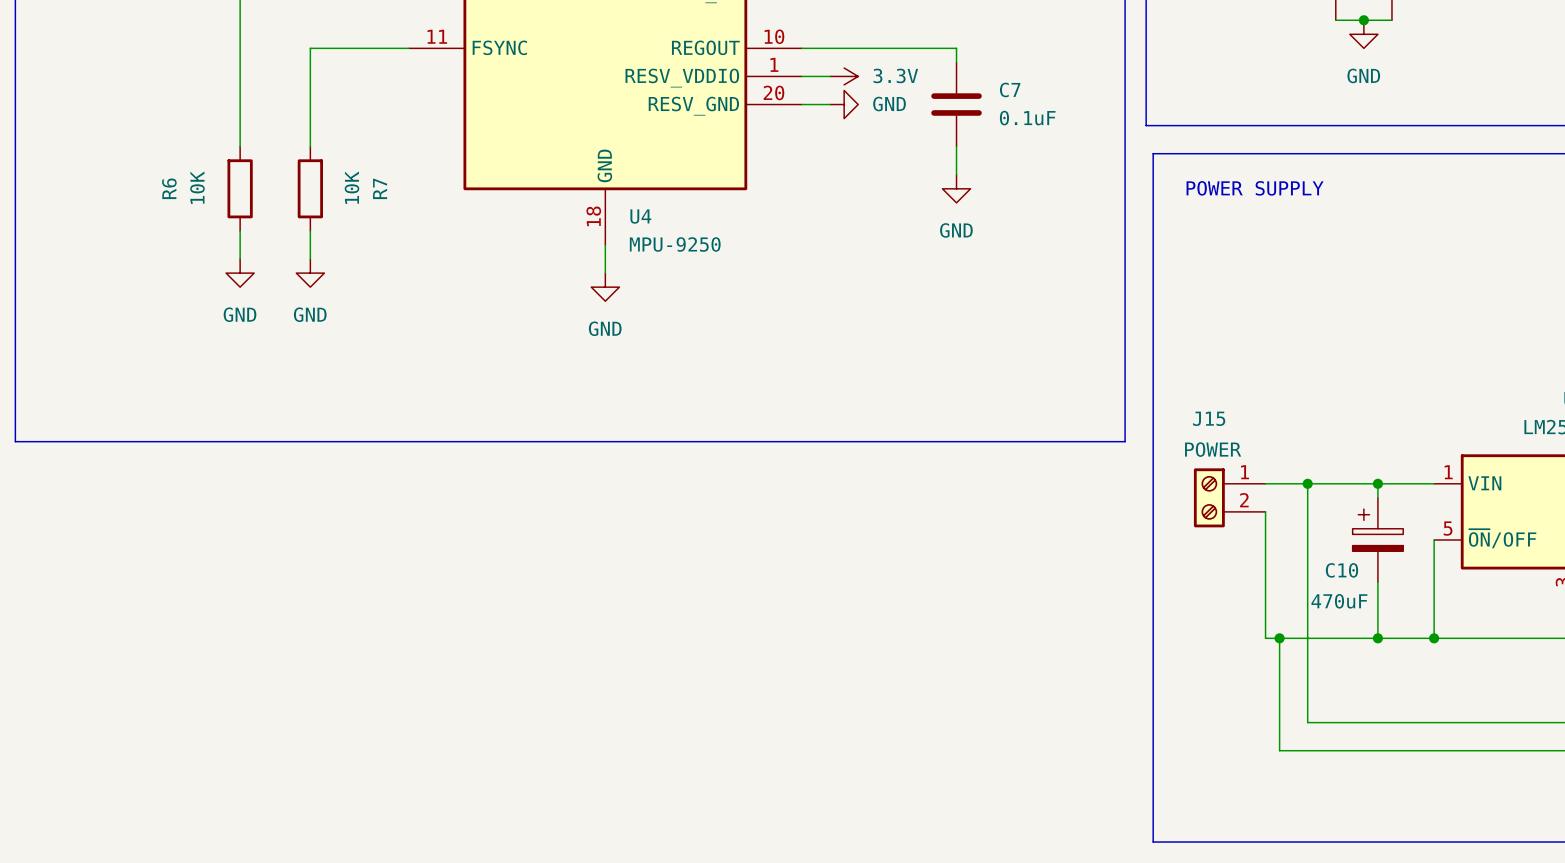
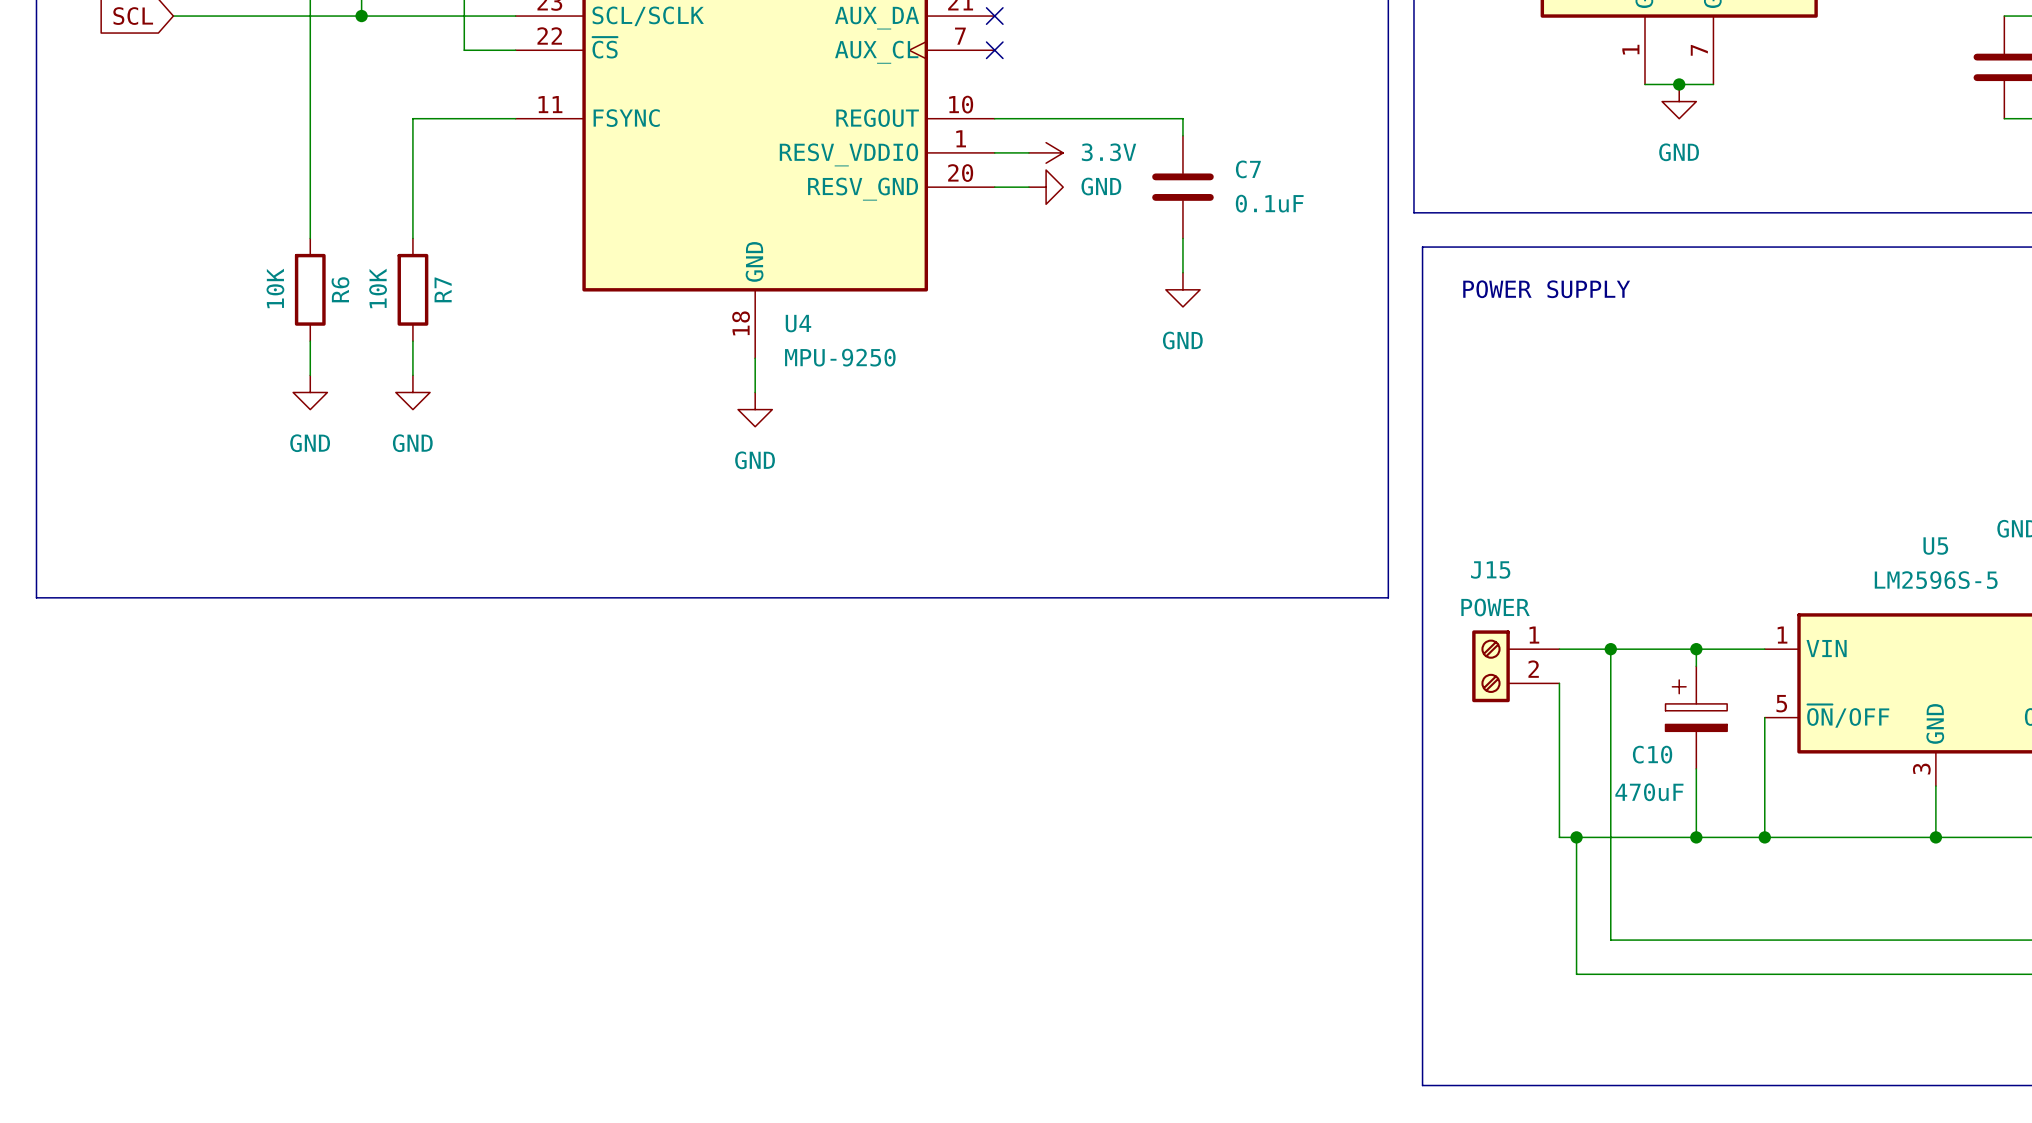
wire: (324, 48) (310, 48) (310, 146) -> (412, 118) (412, 238)
R6 value position: 10K (197, 187) -> 10K (275, 288)
R7 value position: 10K (351, 187) -> 10K (378, 288)
R6 name position: R6 (169, 188) -> R6 (340, 289)
R7 position: (310, 188) -> (412, 289)
R7 name position: R7 (380, 188) -> R7 (443, 289)
wire: (310, 230) (310, 259) -> (412, 341) (412, 375)
power symbol position: GND (310, 273) -> GND (412, 392)

